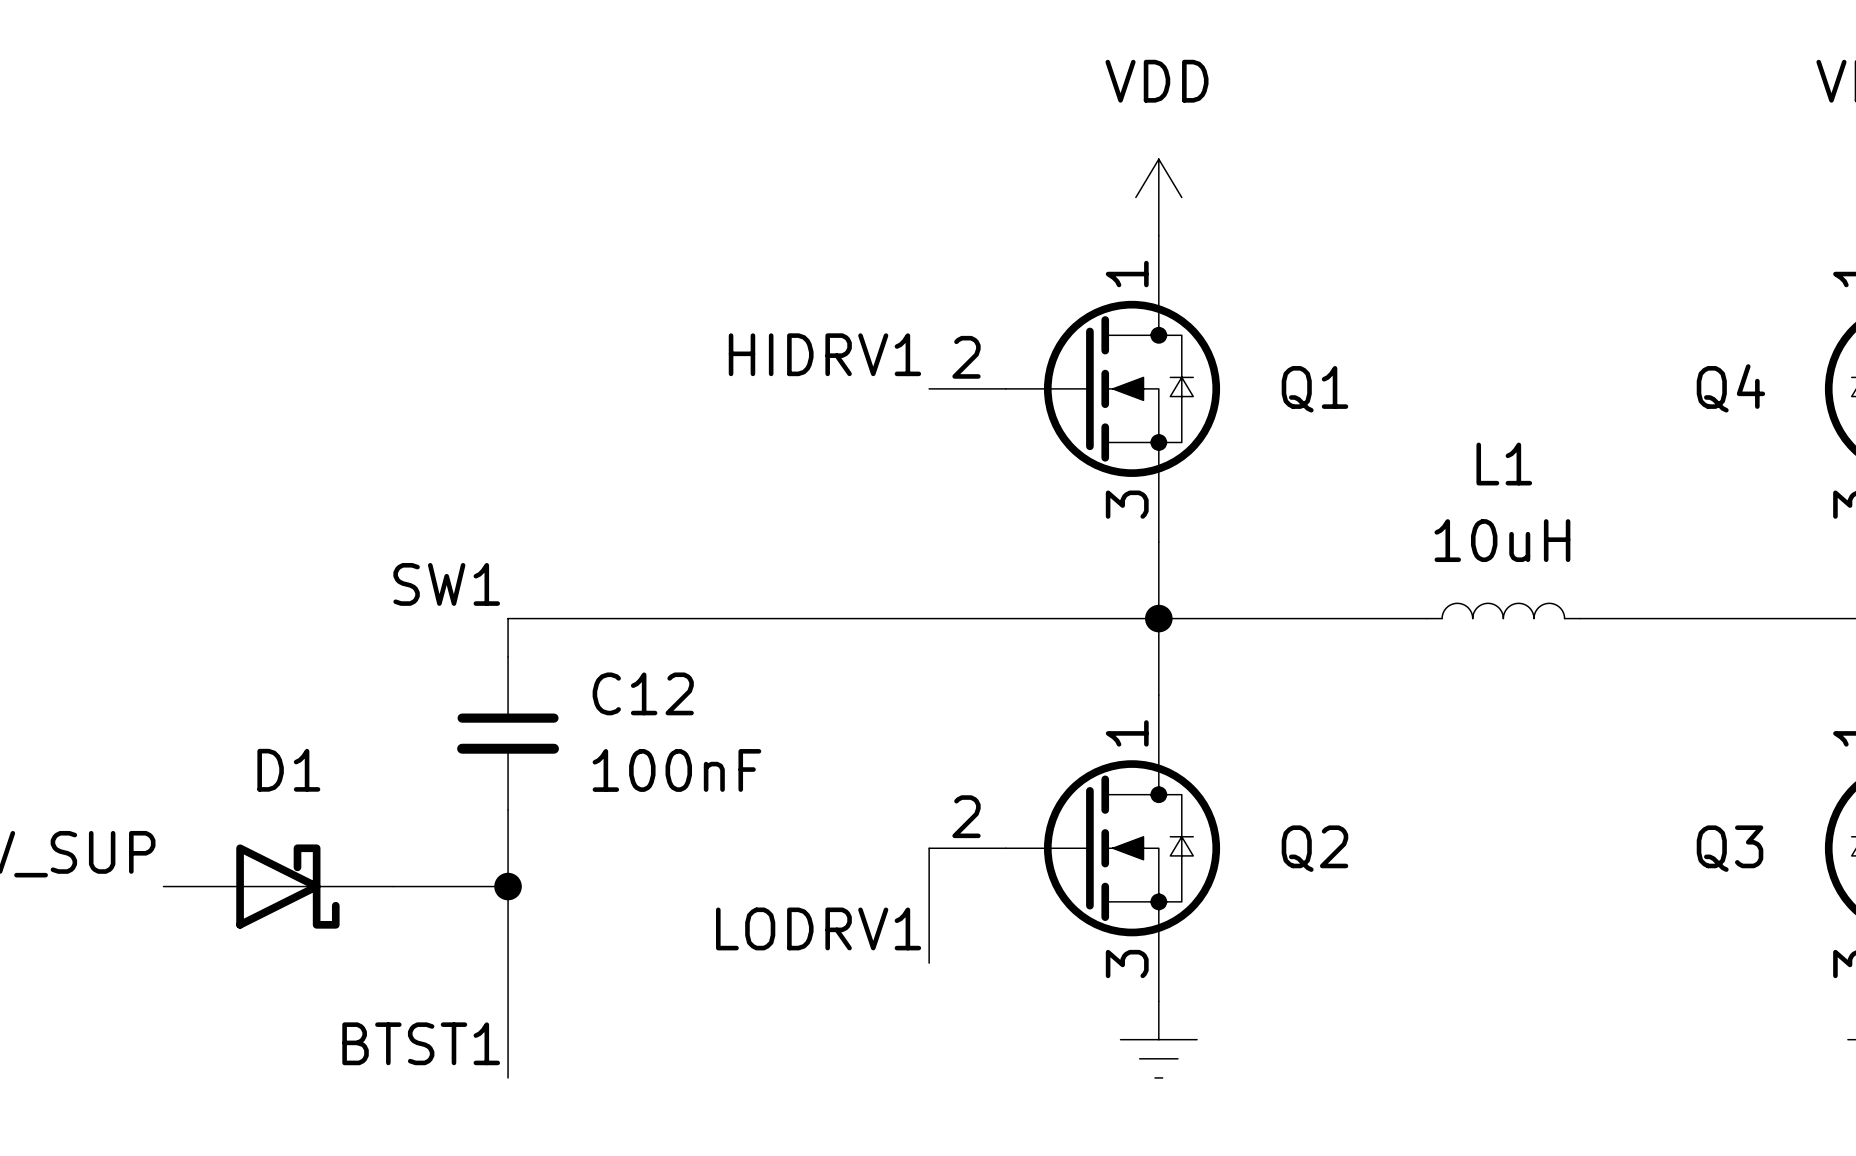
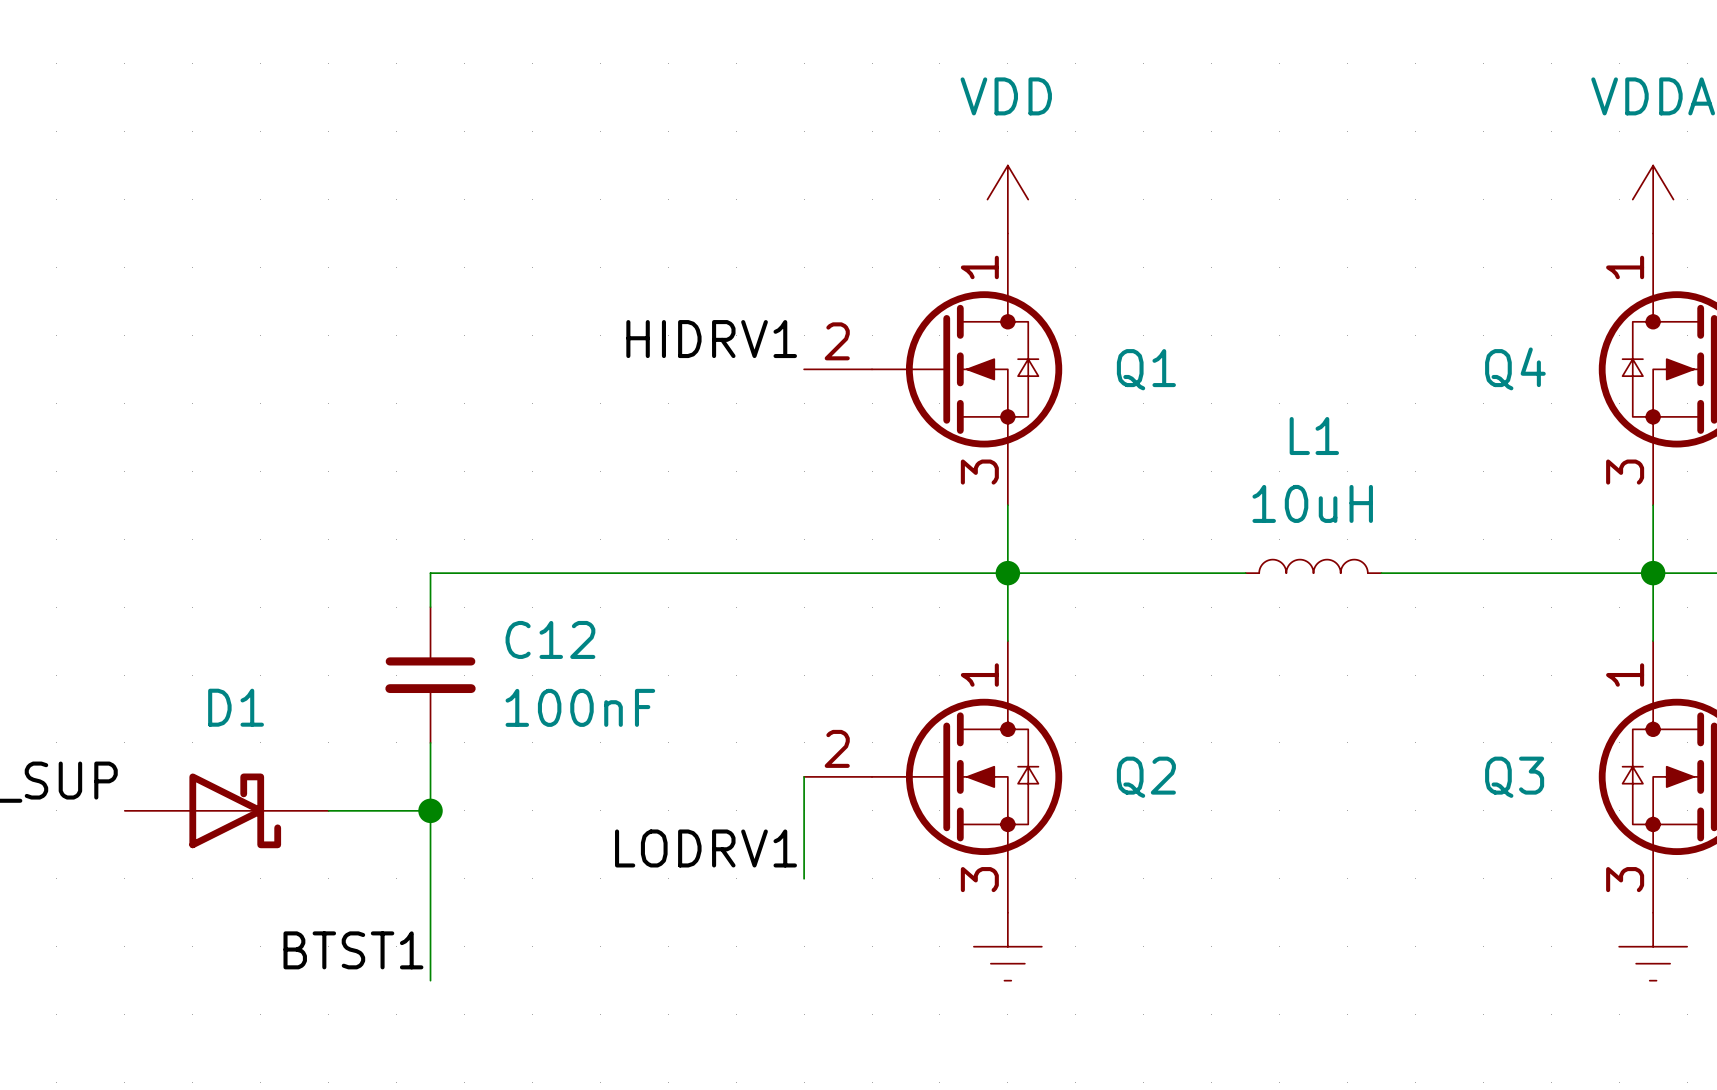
label: SW1 (446, 584) -> none

